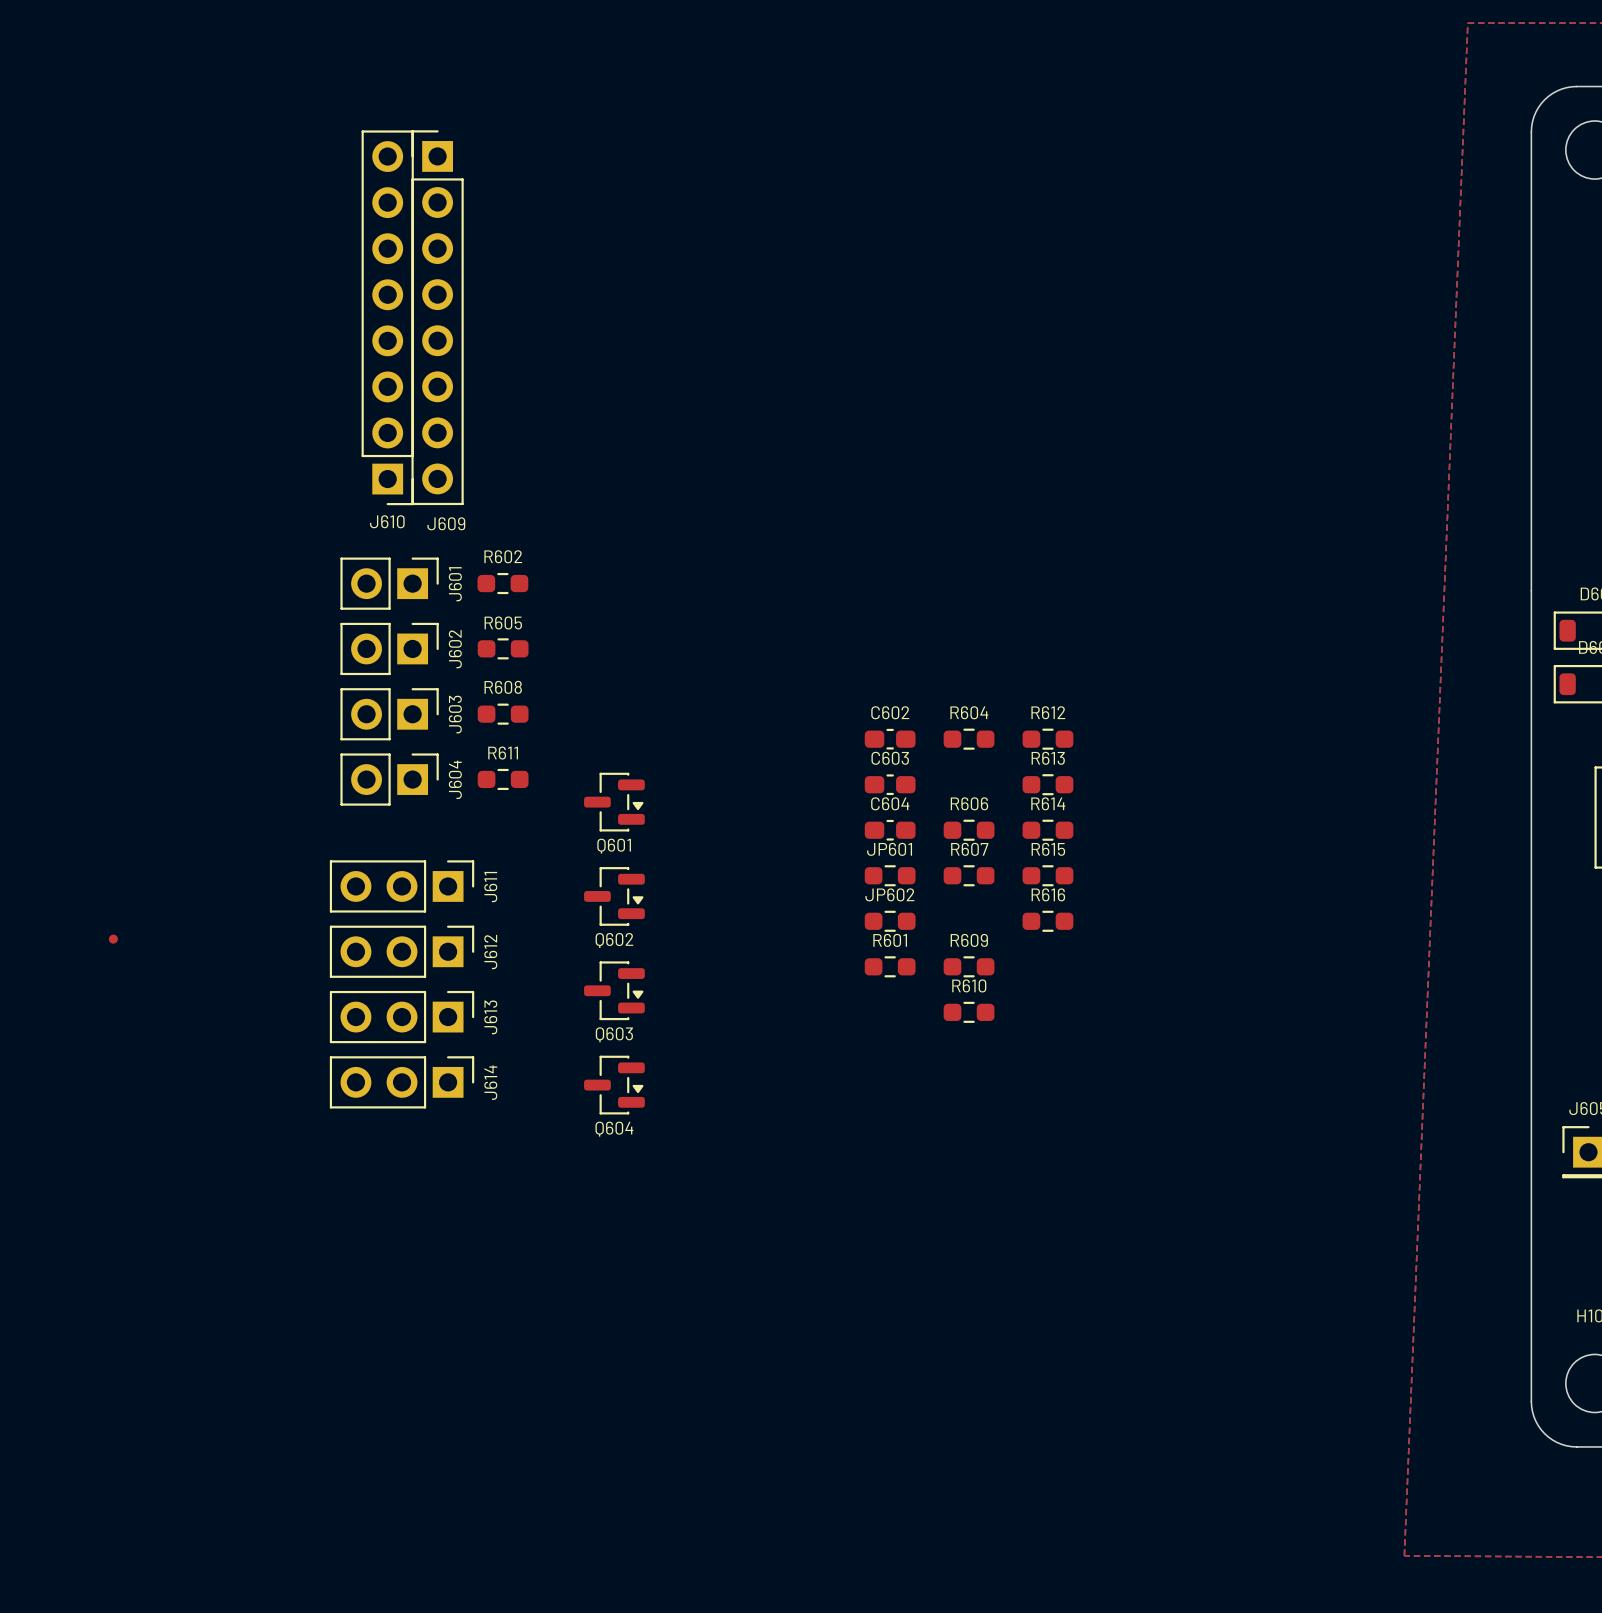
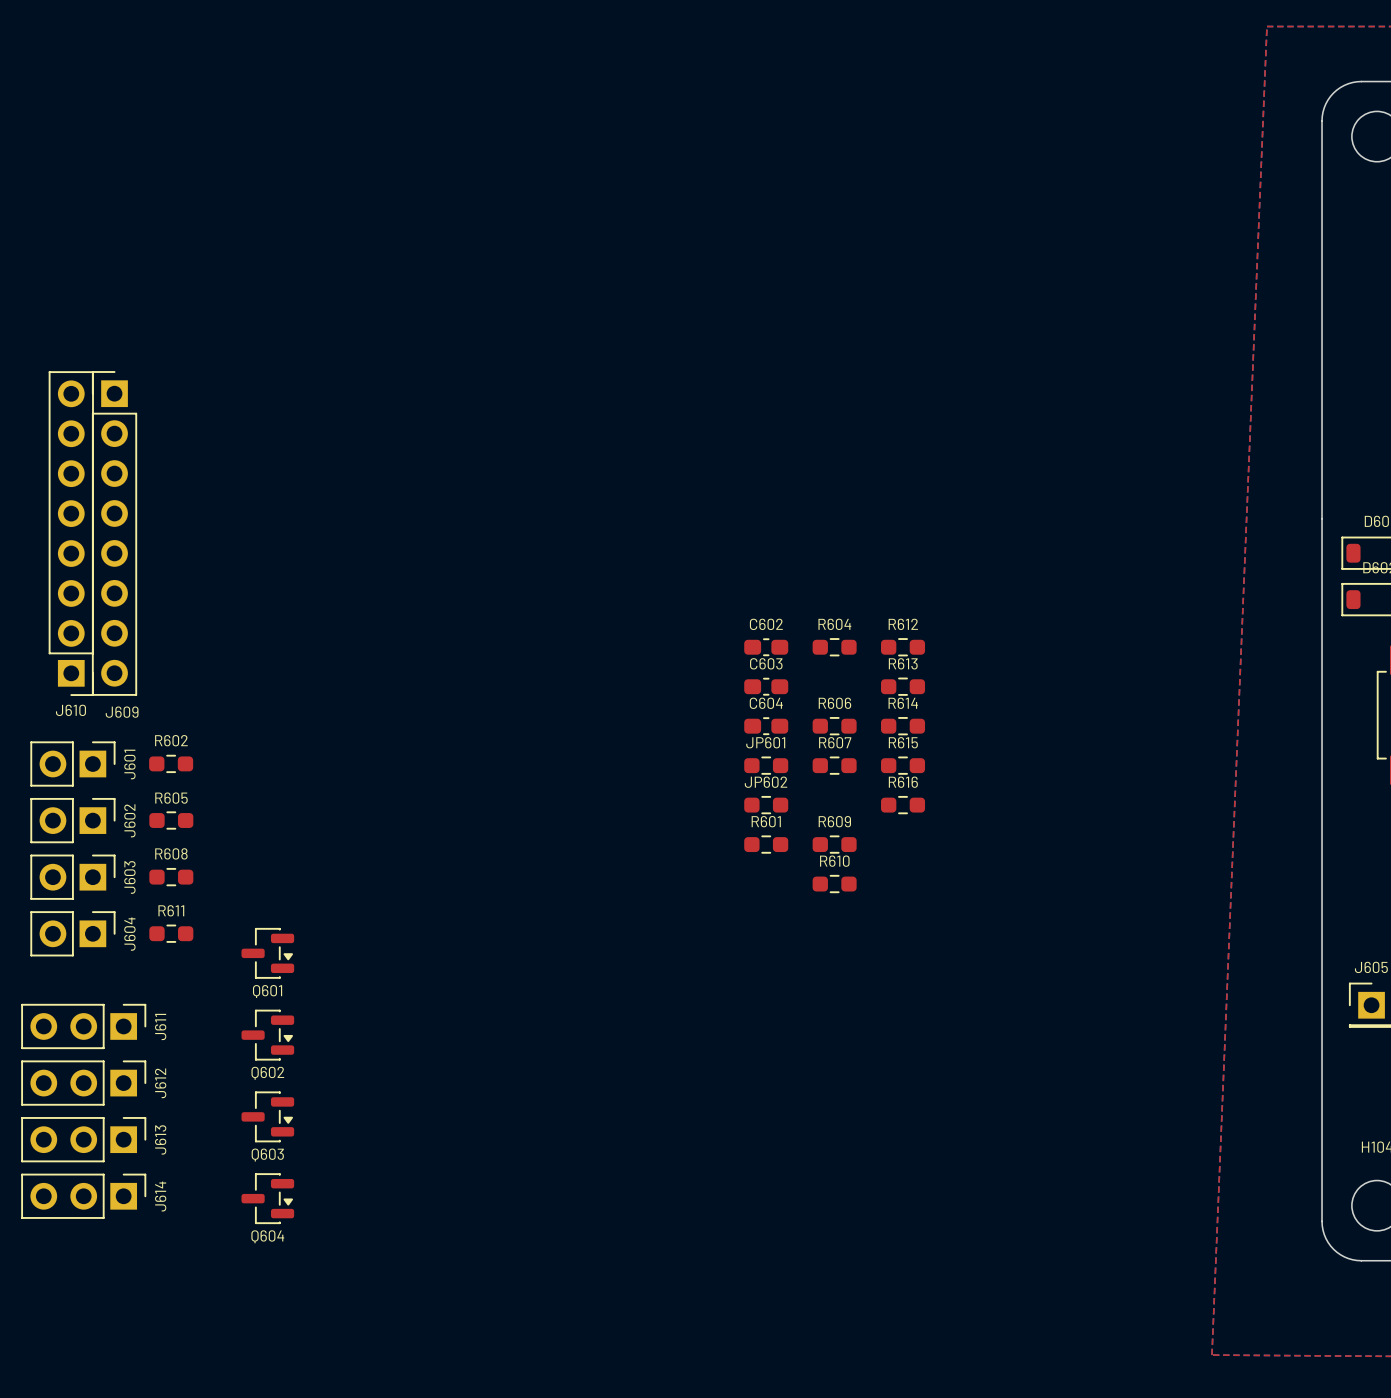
J610 position: (387, 317) -> (71, 533)
J609 position: (437, 317) -> (114, 533)
J601 position: (389, 583) -> (72, 764)
R602 position: (502, 583) -> (171, 763)
J602 position: (389, 648) -> (72, 820)
R605 position: (503, 648) -> (171, 820)
J603 position: (389, 714) -> (72, 877)
R608 position: (503, 714) -> (171, 877)
J604 position: (389, 779) -> (72, 933)
R611 position: (503, 779) -> (171, 933)
Q601 position: (614, 802) -> (267, 953)
J611 position: (402, 886) -> (83, 1026)
Q602 position: (614, 896) -> (267, 1035)
J612 position: (402, 951) -> (83, 1083)
Q603 position: (614, 990) -> (267, 1116)
J613 position: (402, 1017) -> (83, 1139)
J614 position: (402, 1082) -> (83, 1196)
Q604 position: (614, 1085) -> (267, 1198)

